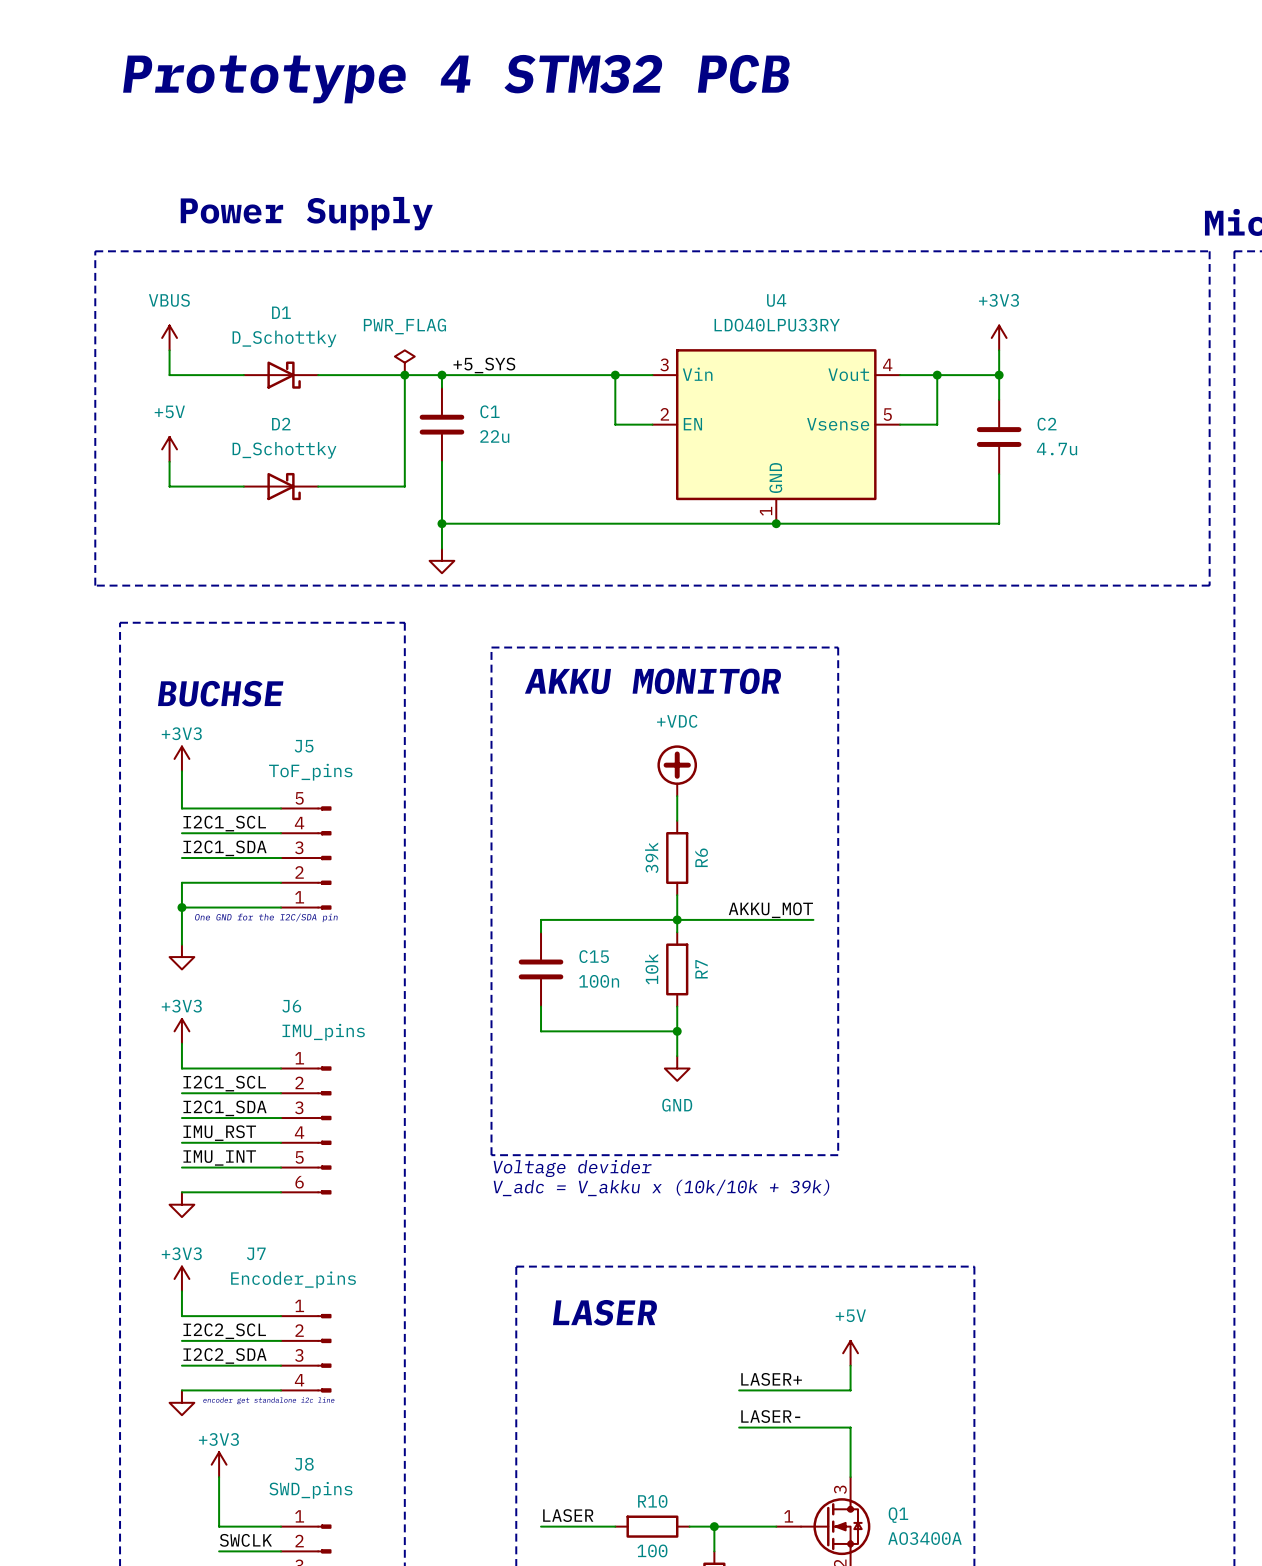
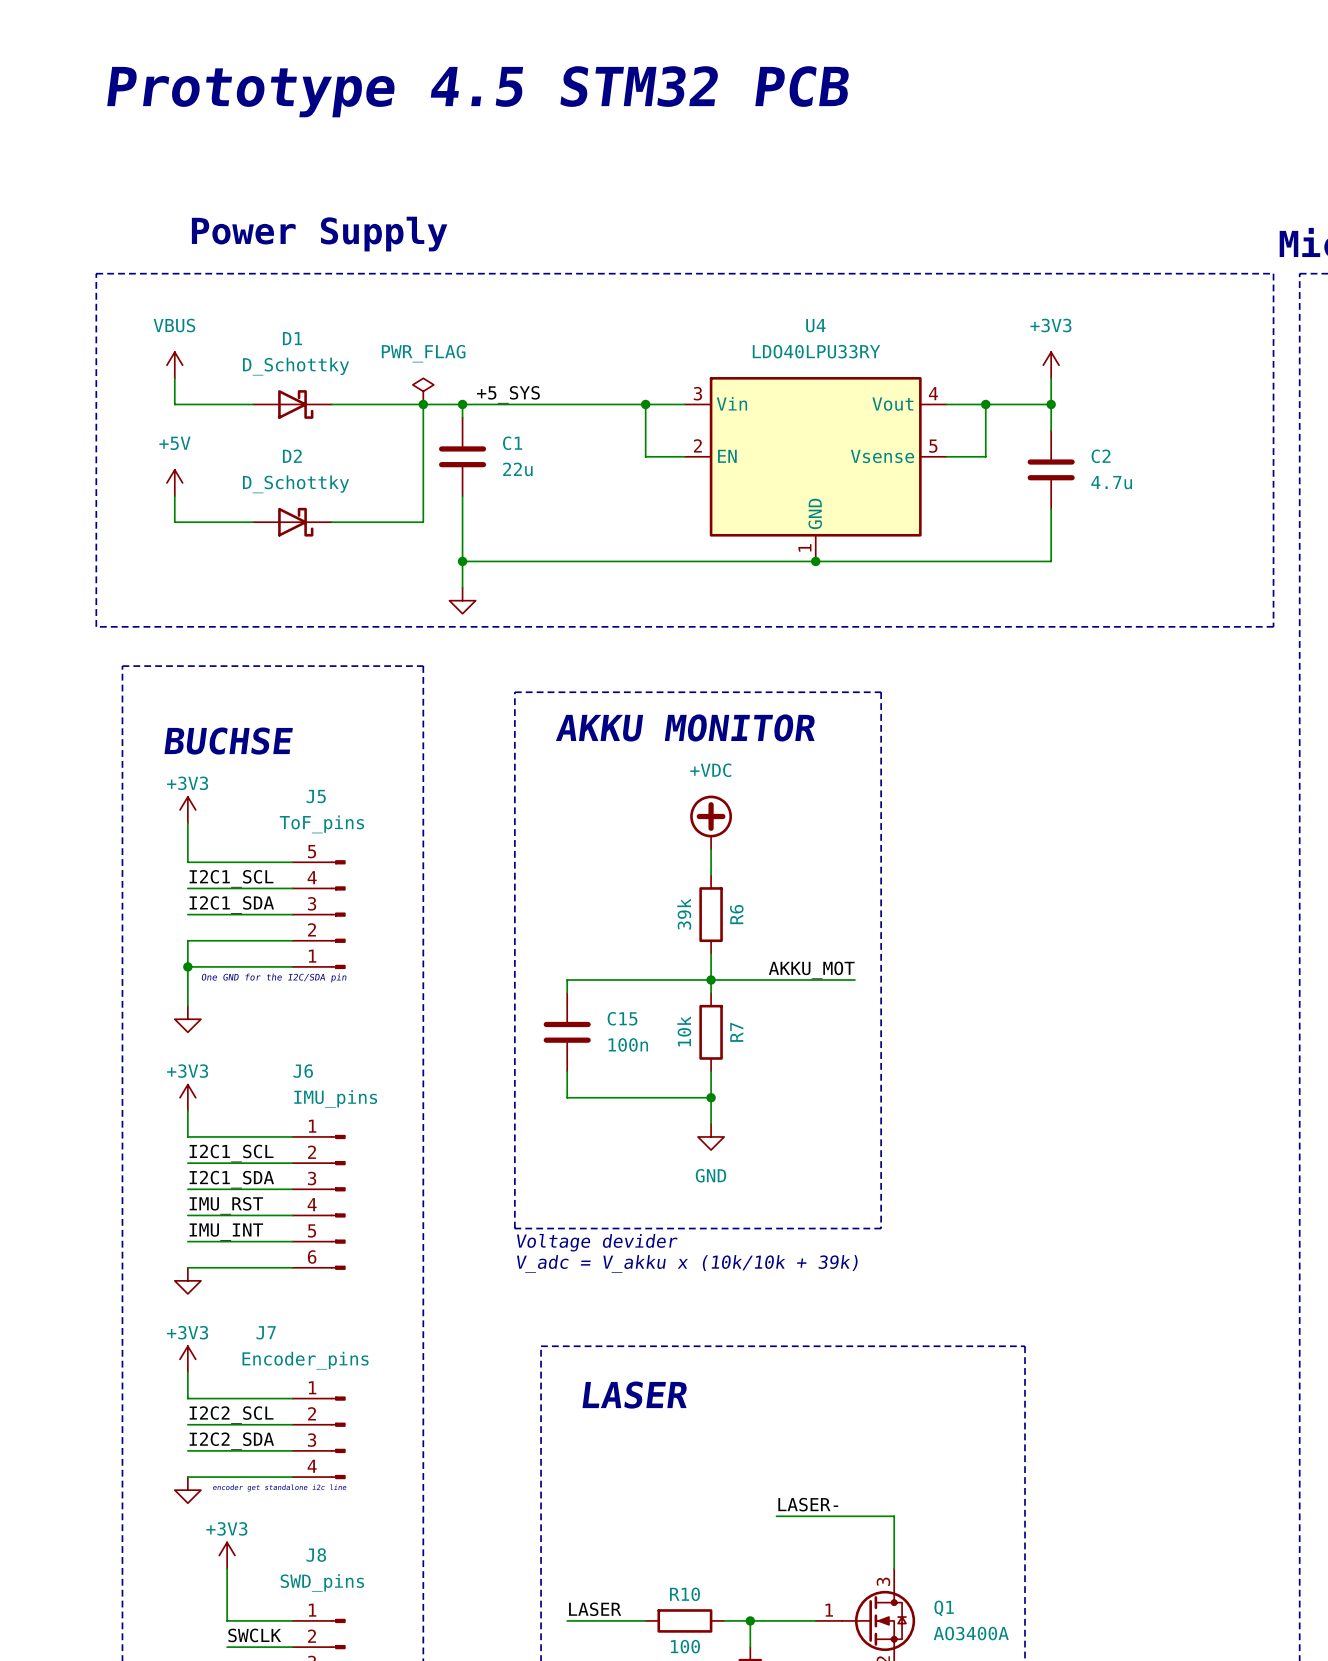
text: Prototype 4 STM32 PCB (456, 79) -> Prototype 4.5 STM32 PCB (478, 91)
power symbol: +5V (850, 1353) -> none
wire: (850, 1365) (850, 1390) (739, 1390) -> none
label: LASER+ (771, 1379) -> none

